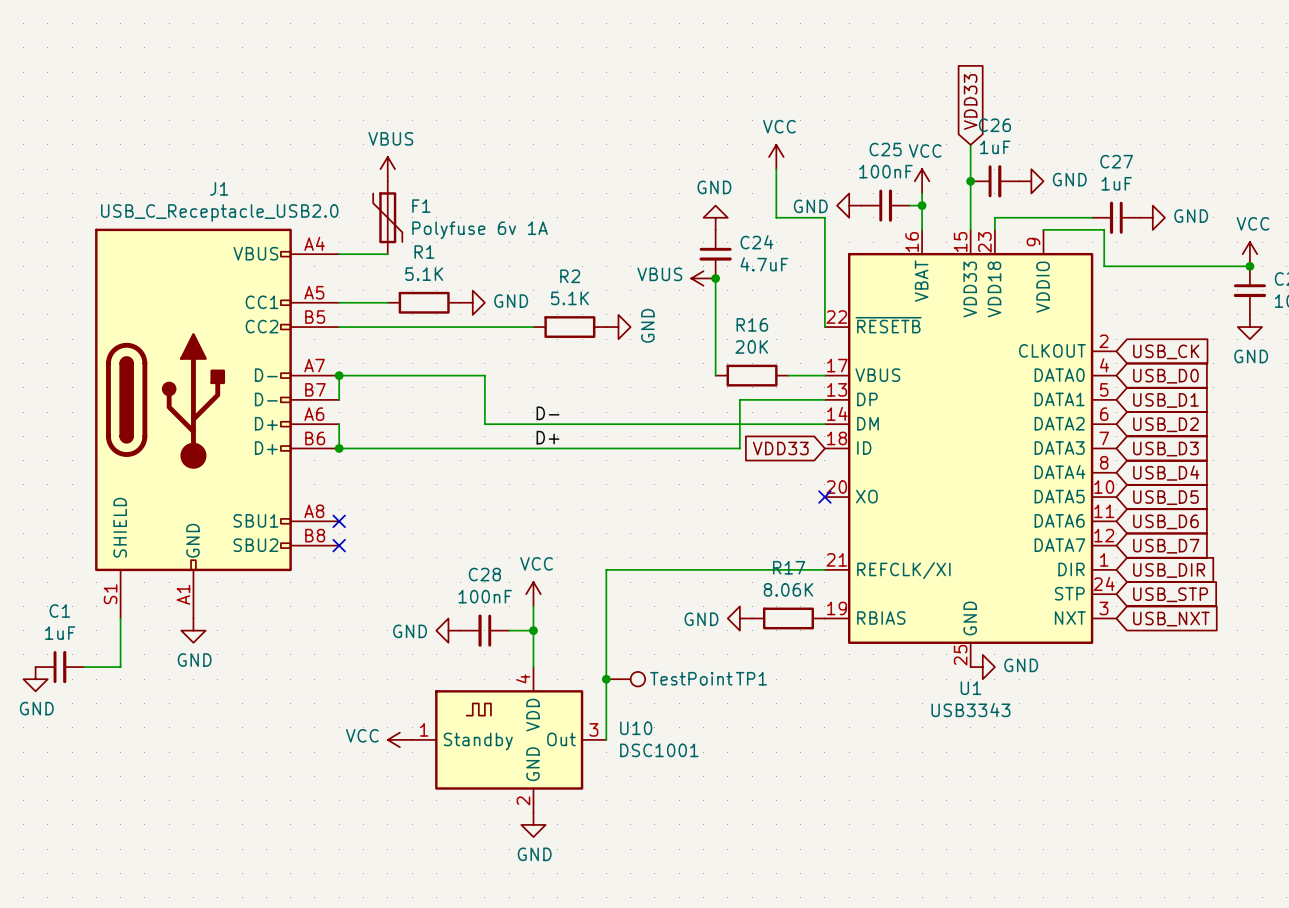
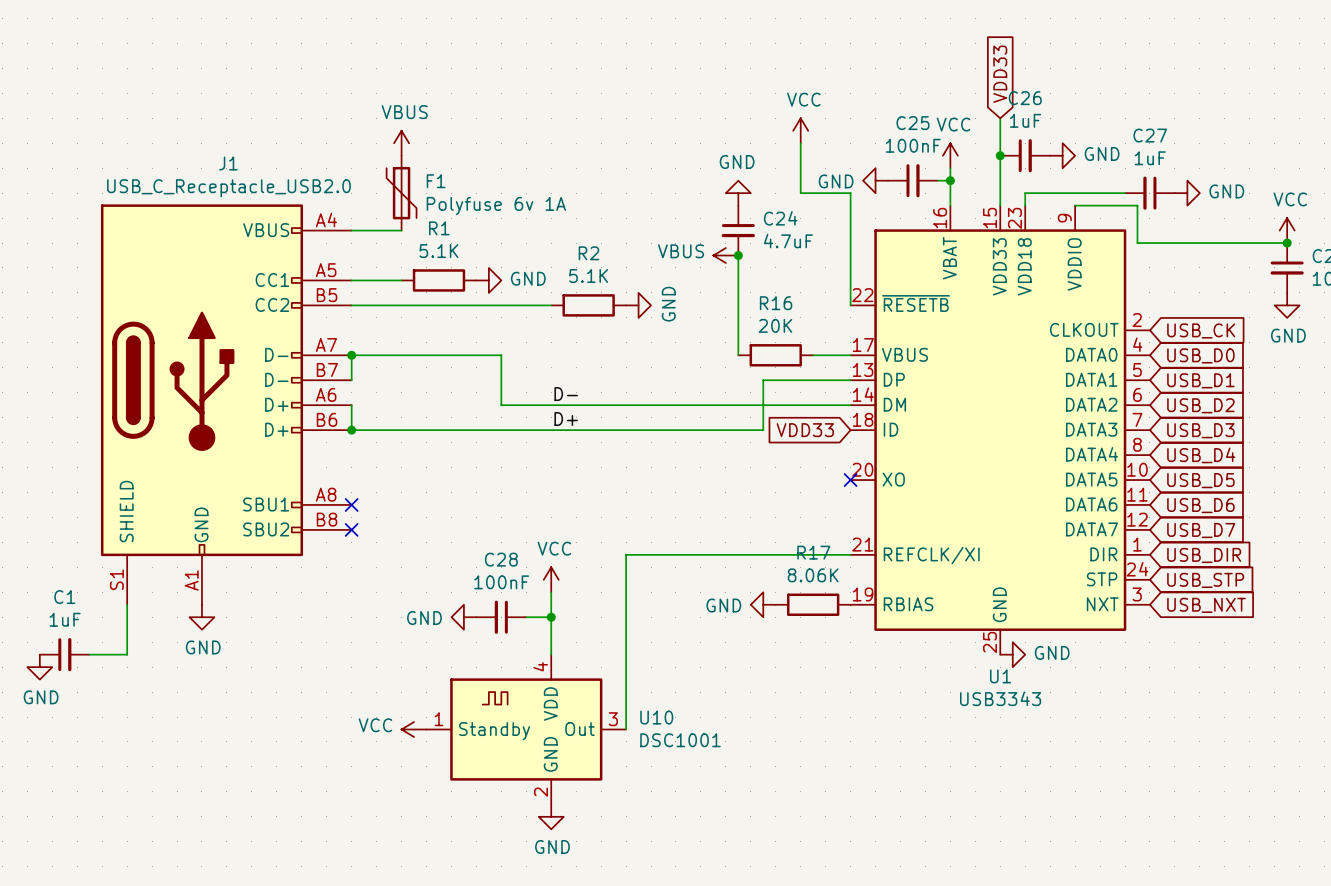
junction: (606, 679) -> none
TP1: TestPoint (625, 679) -> none

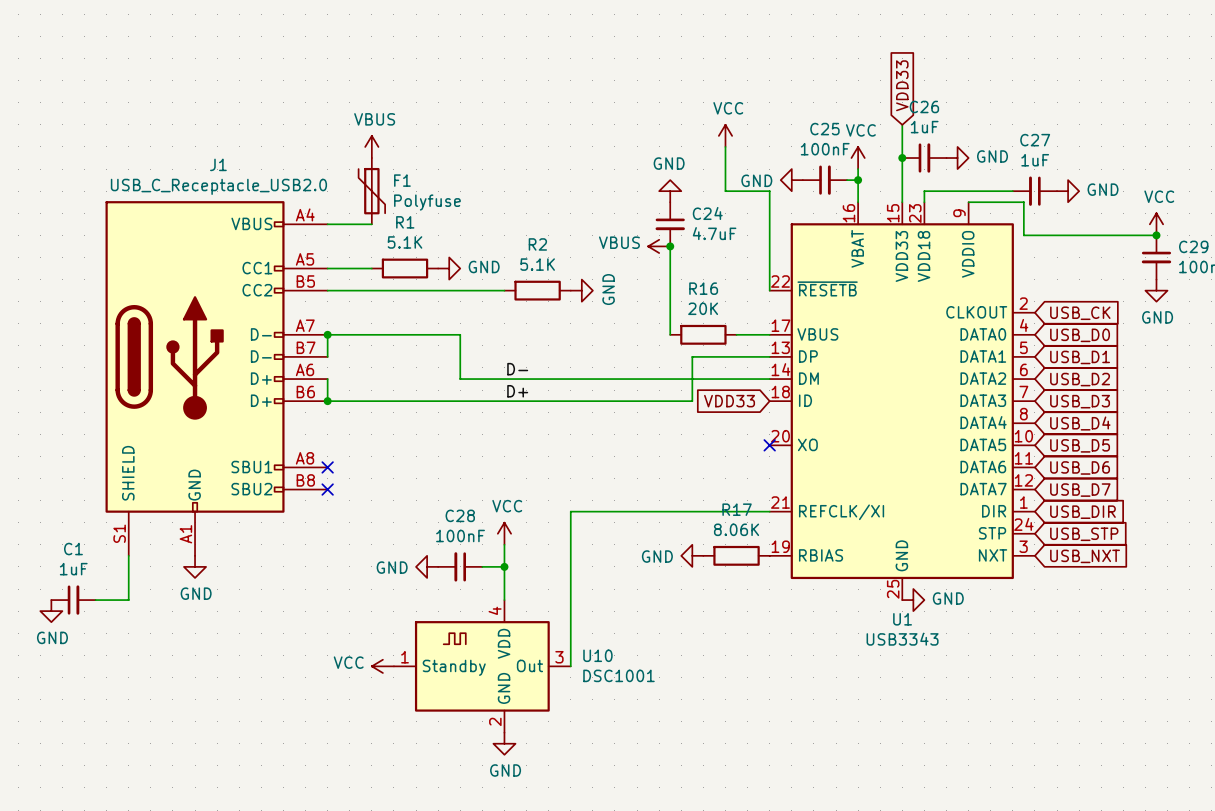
F1 value: Polyfuse 6v 1A (496, 205) -> Polyfuse (427, 202)

